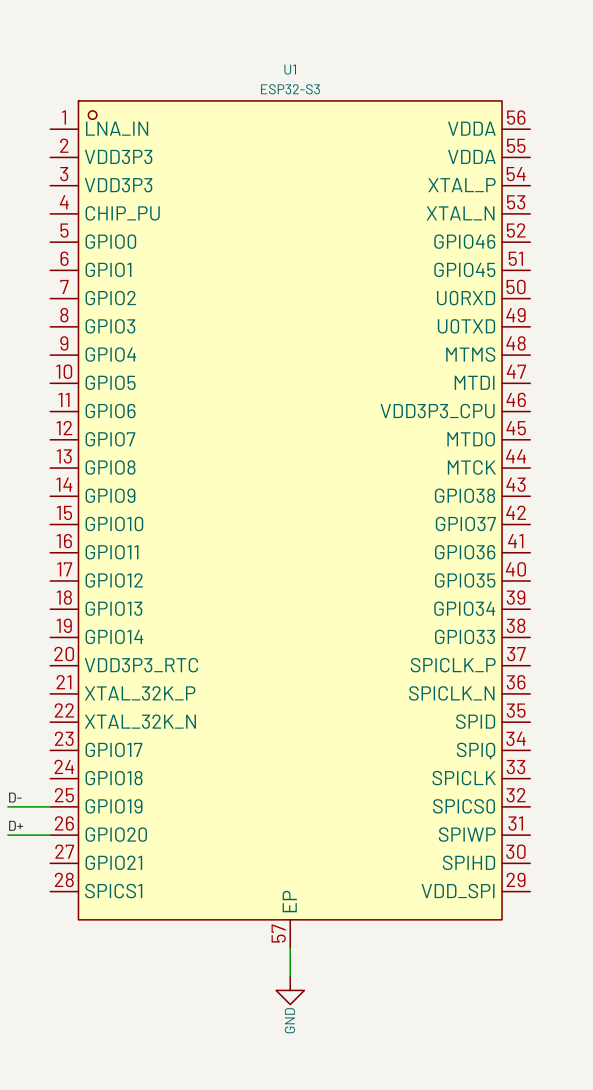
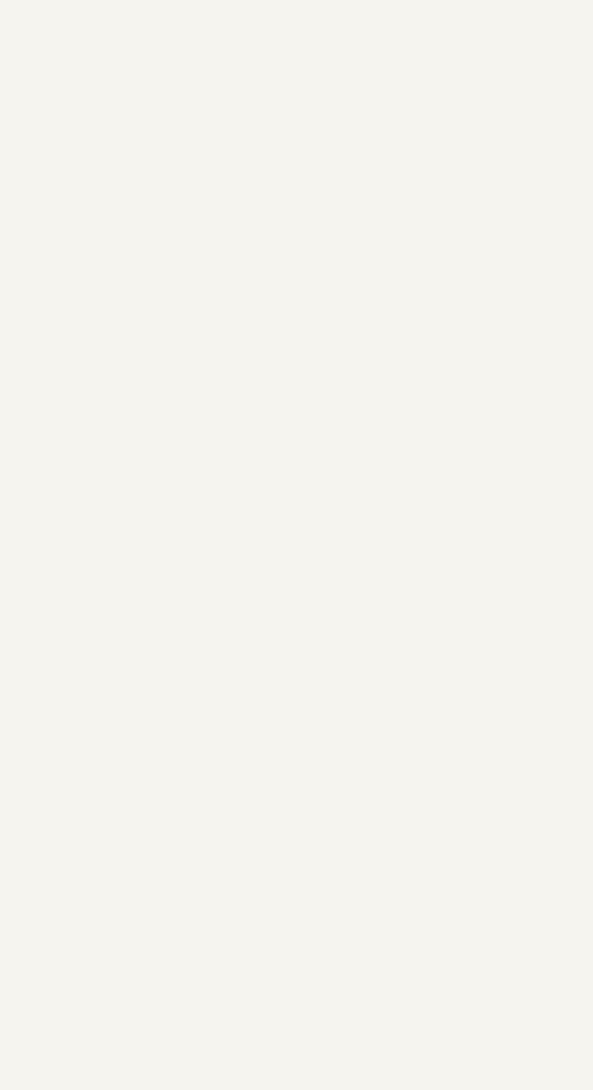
U1: ESP32-S3 (290, 524) -> none
label: D- (15, 797) -> none
wire: (7, 806) (50, 806) -> none
label: D+ (16, 825) -> none
wire: (7, 835) (50, 835) -> none
wire: (290, 948) (290, 976) -> none
power symbol: GND (290, 990) -> none

